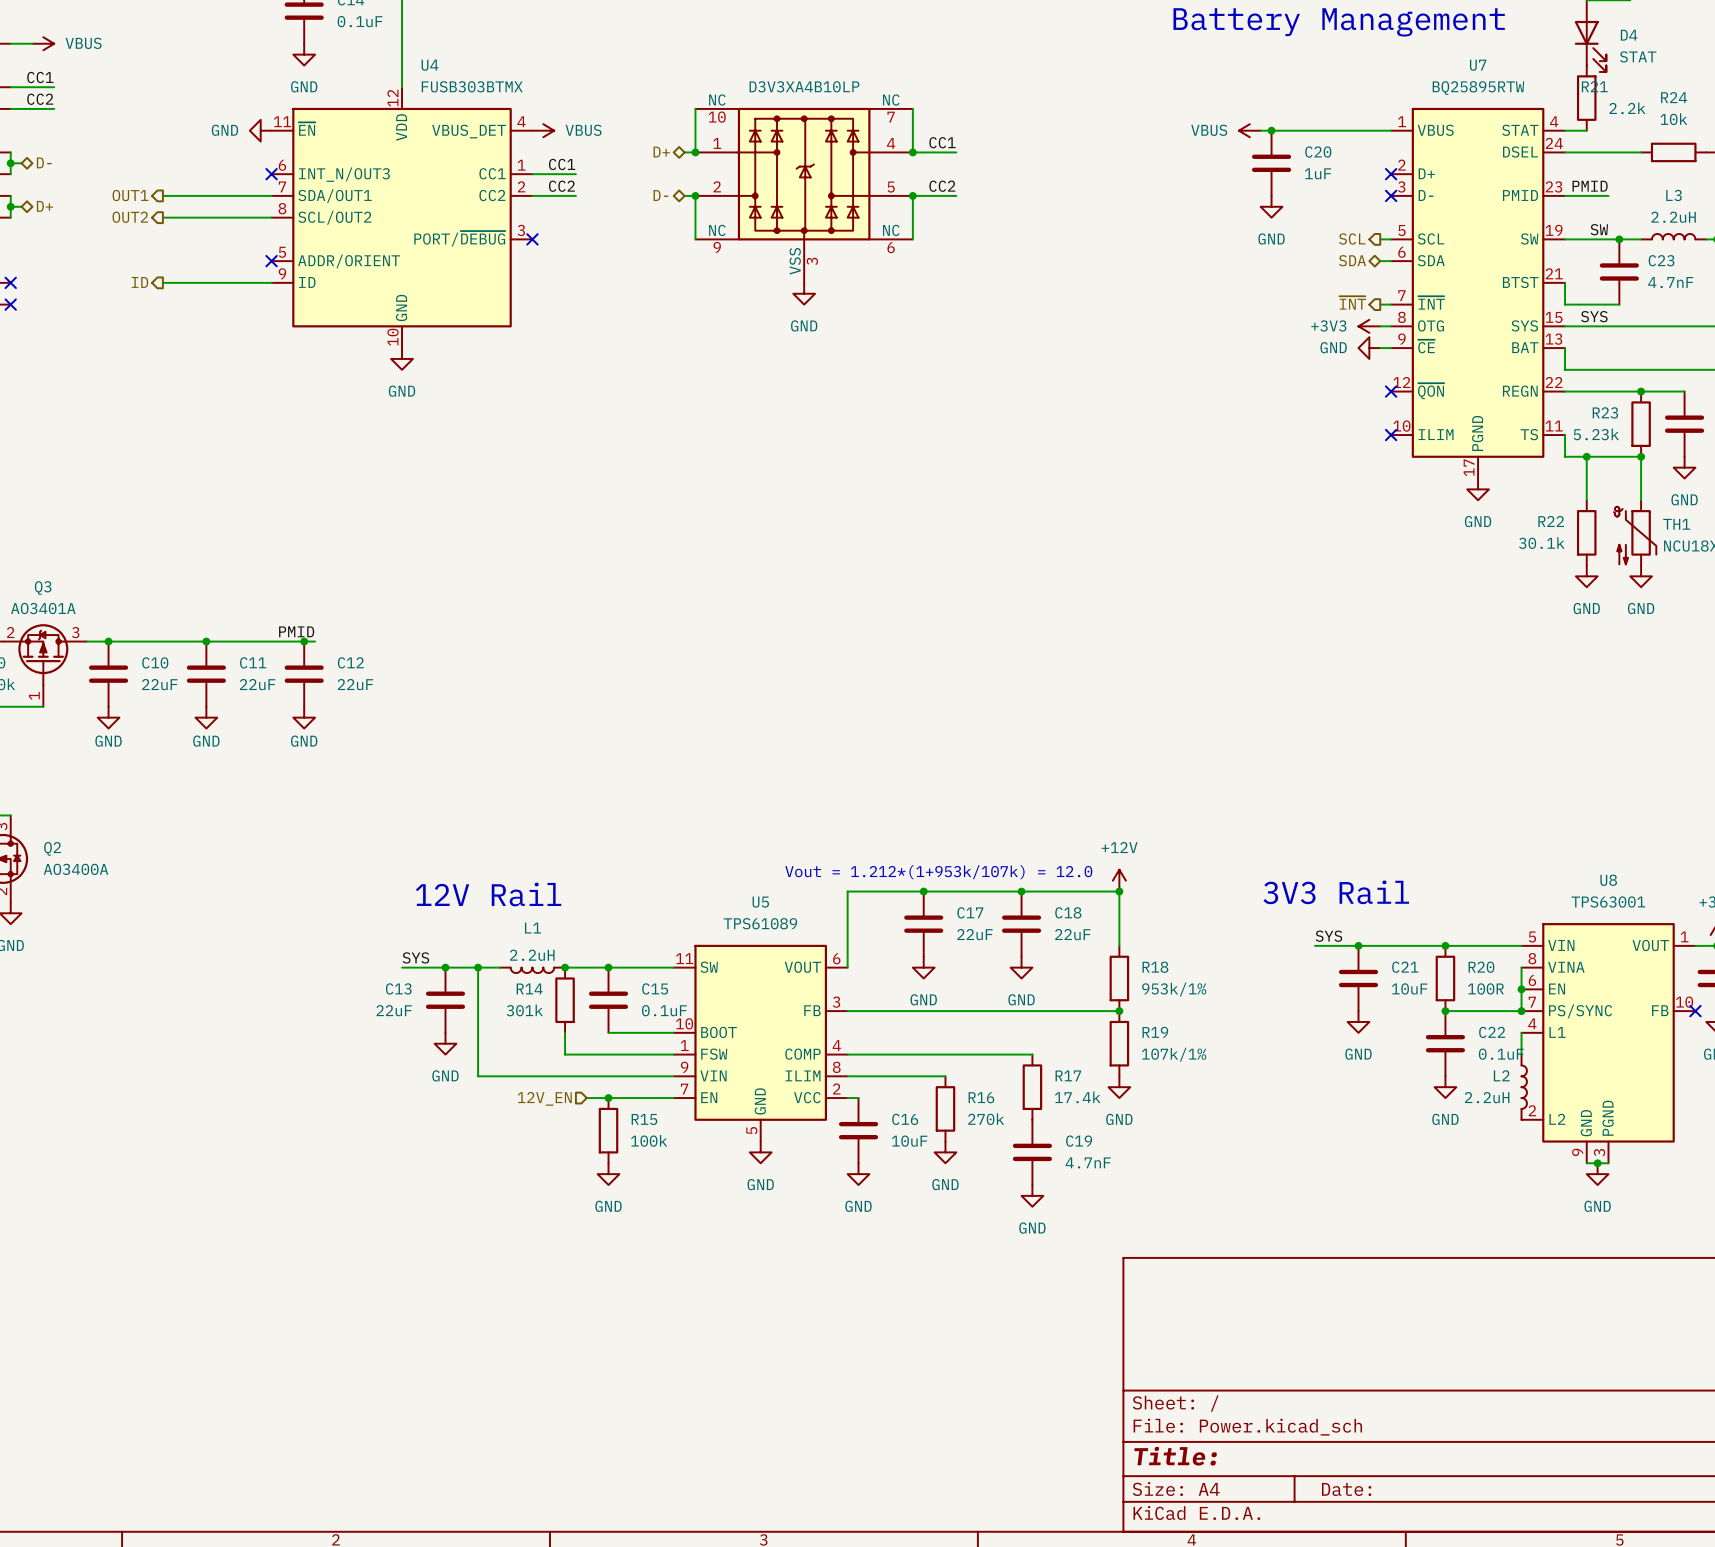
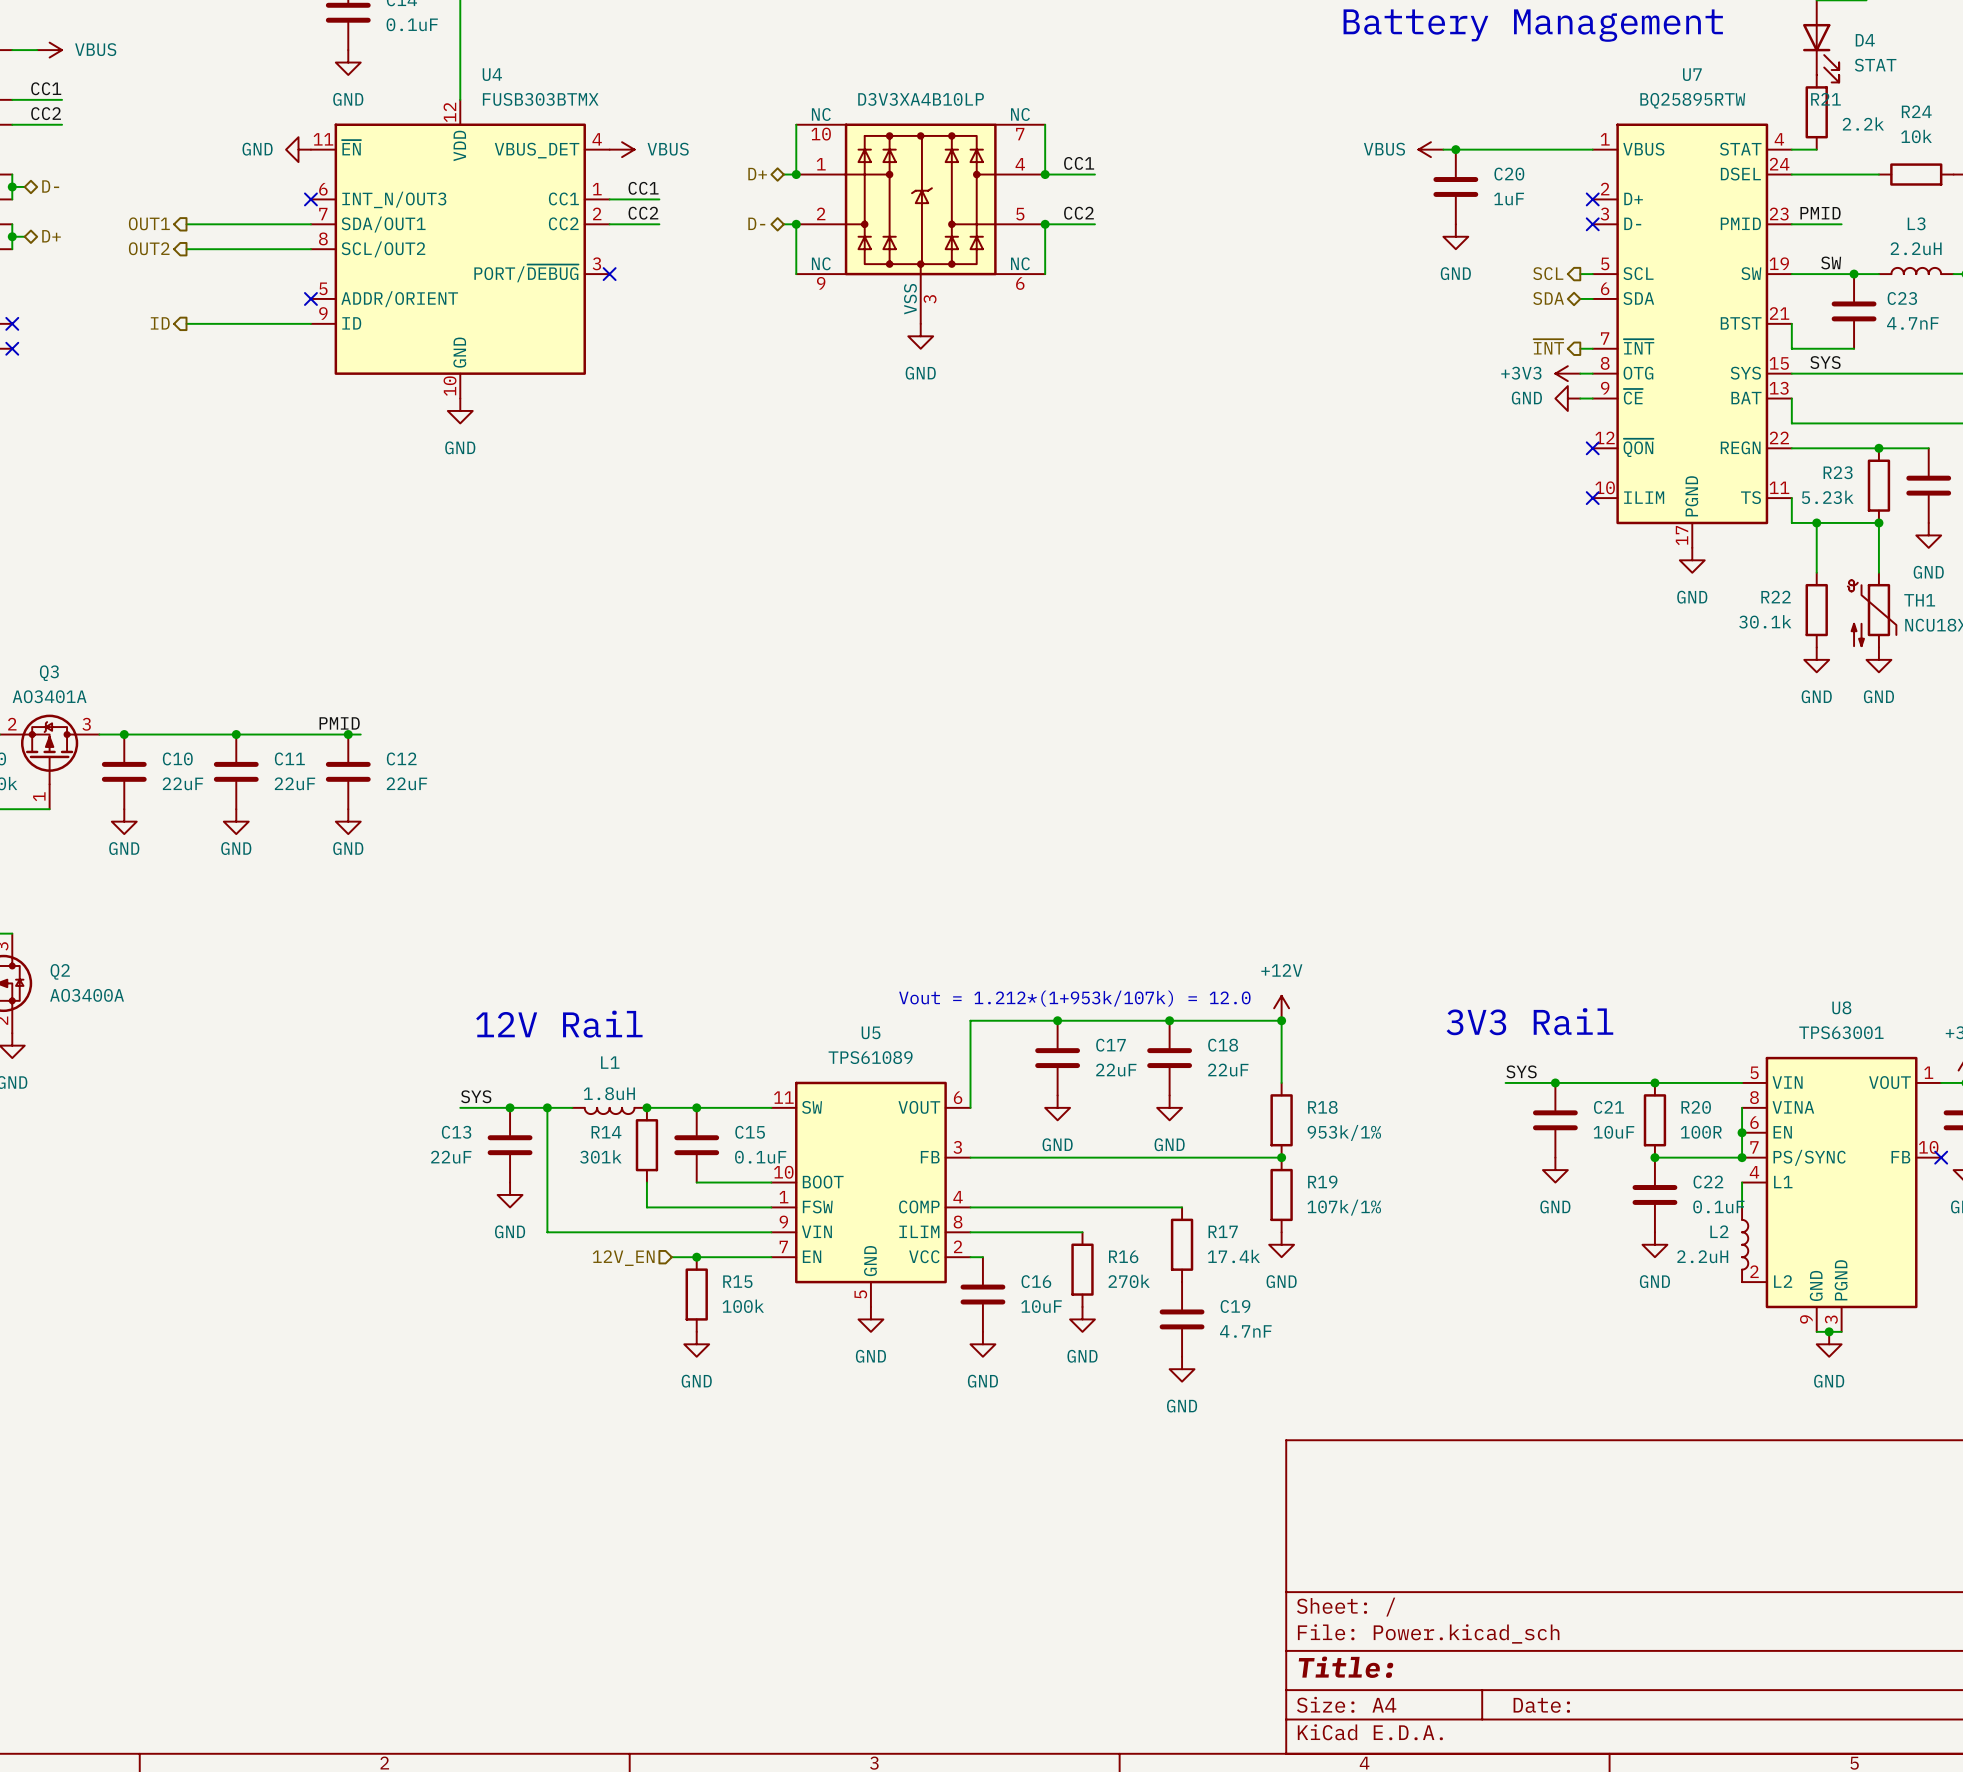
L1 value: 2.2uH (532, 955) -> 1.8uH (609, 1093)

